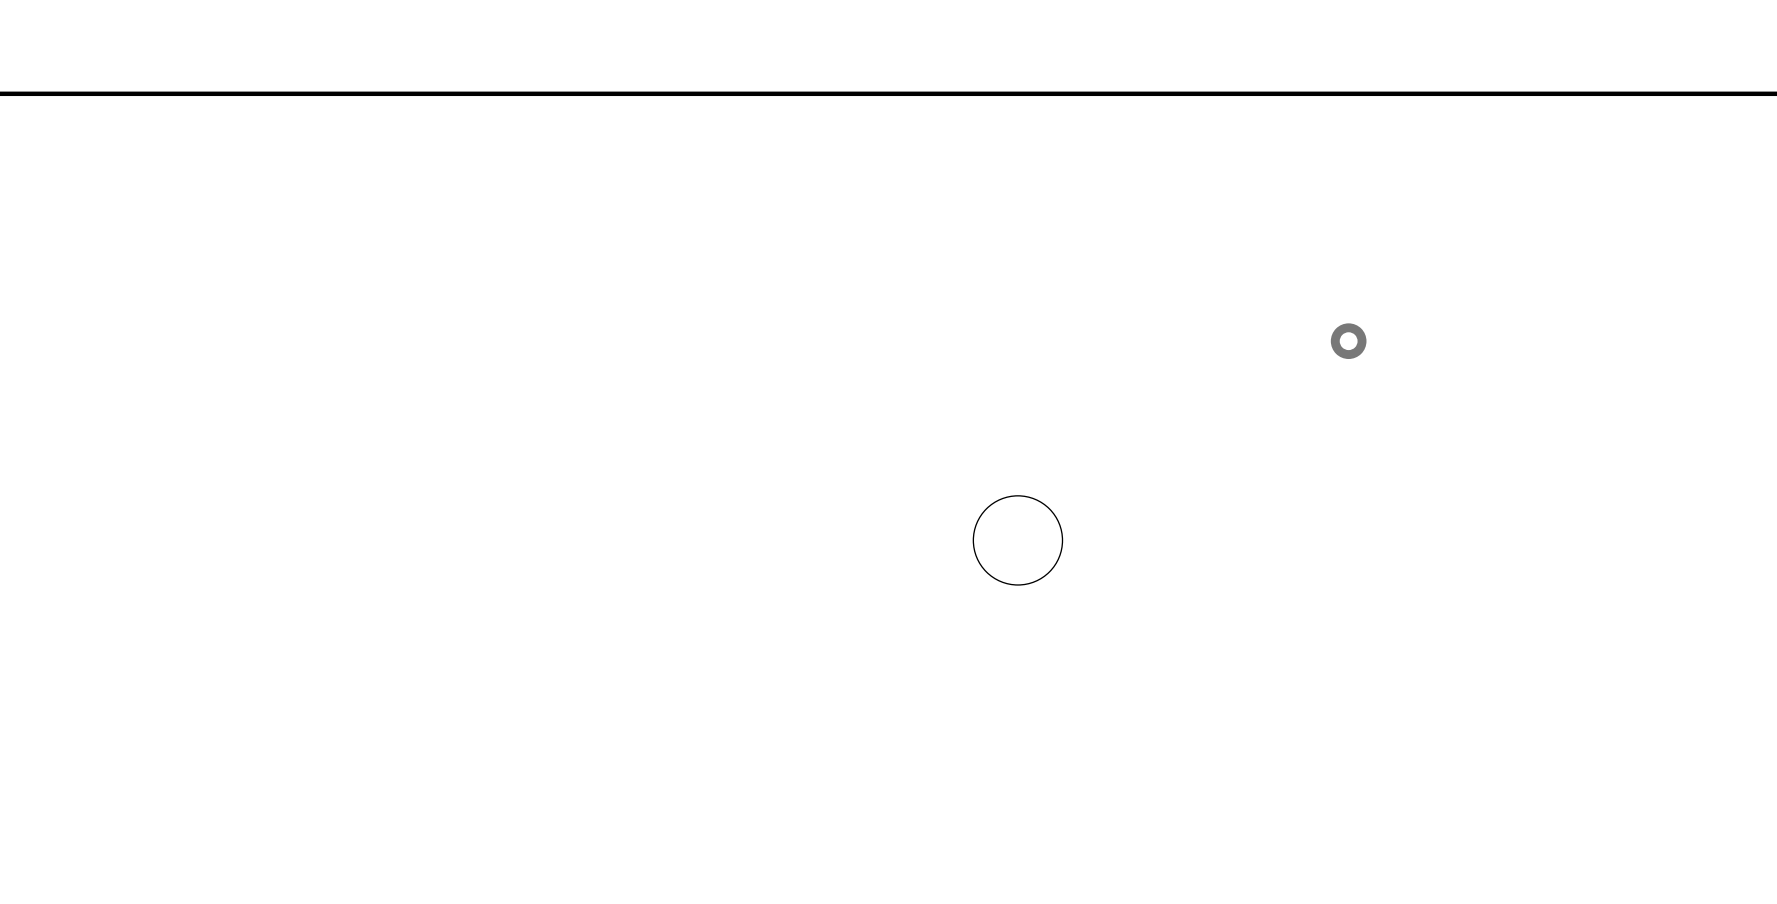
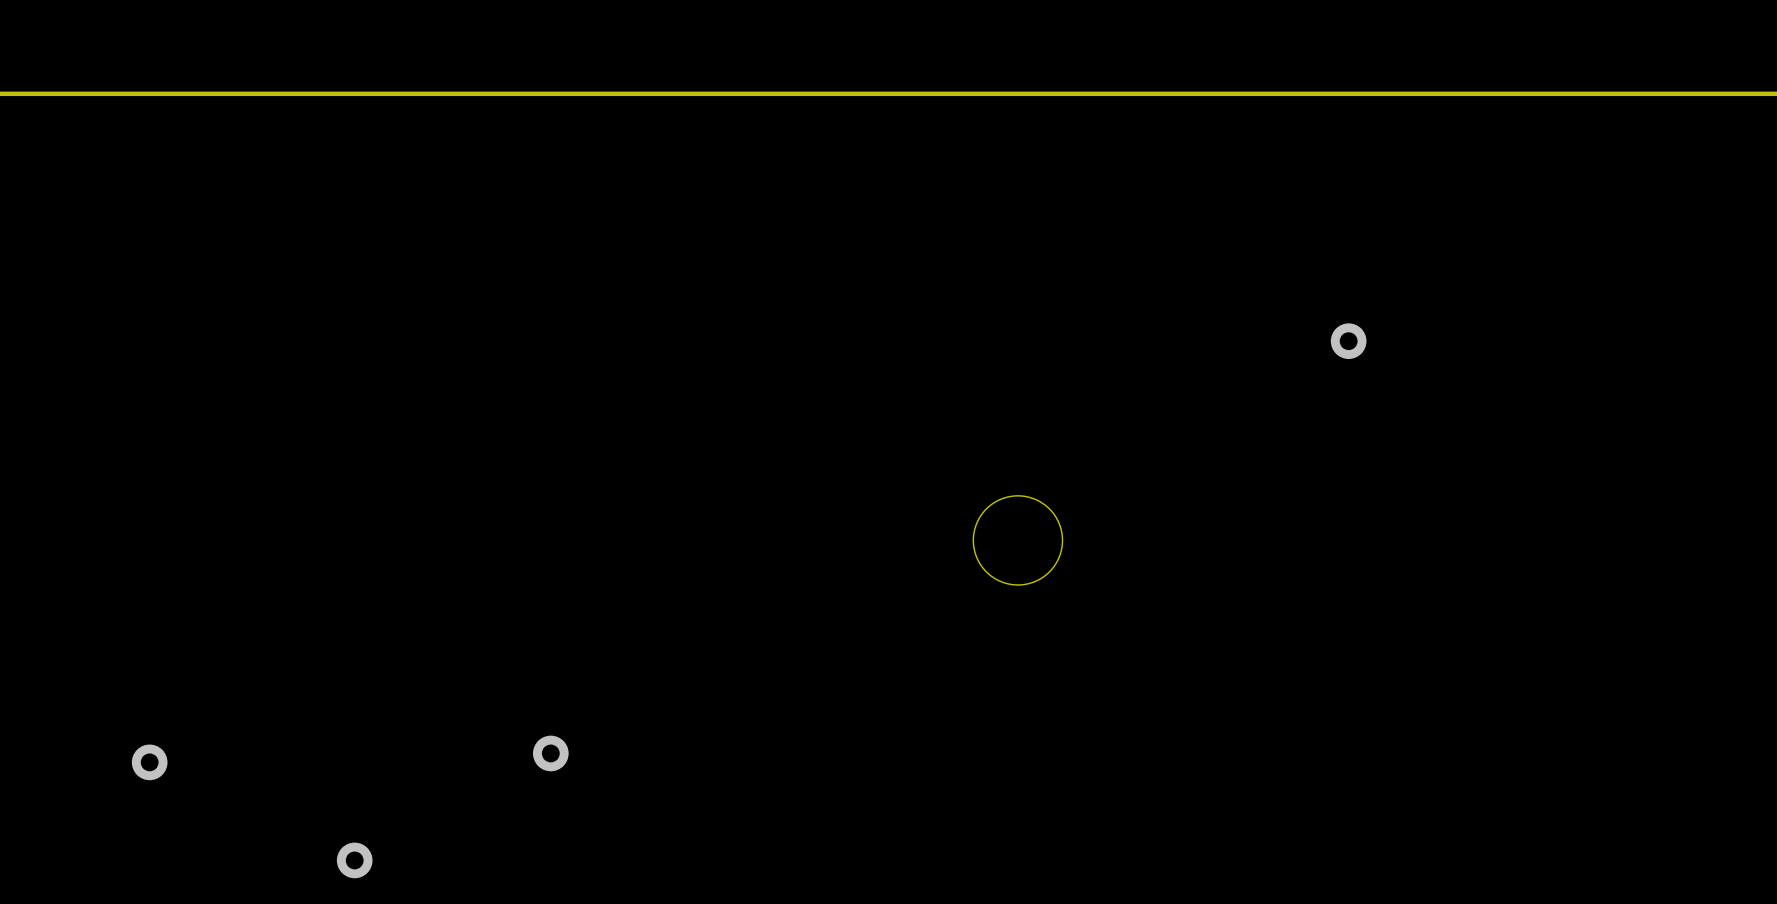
via: none -> (550, 753)
via: none -> (149, 762)
via: none -> (354, 860)

